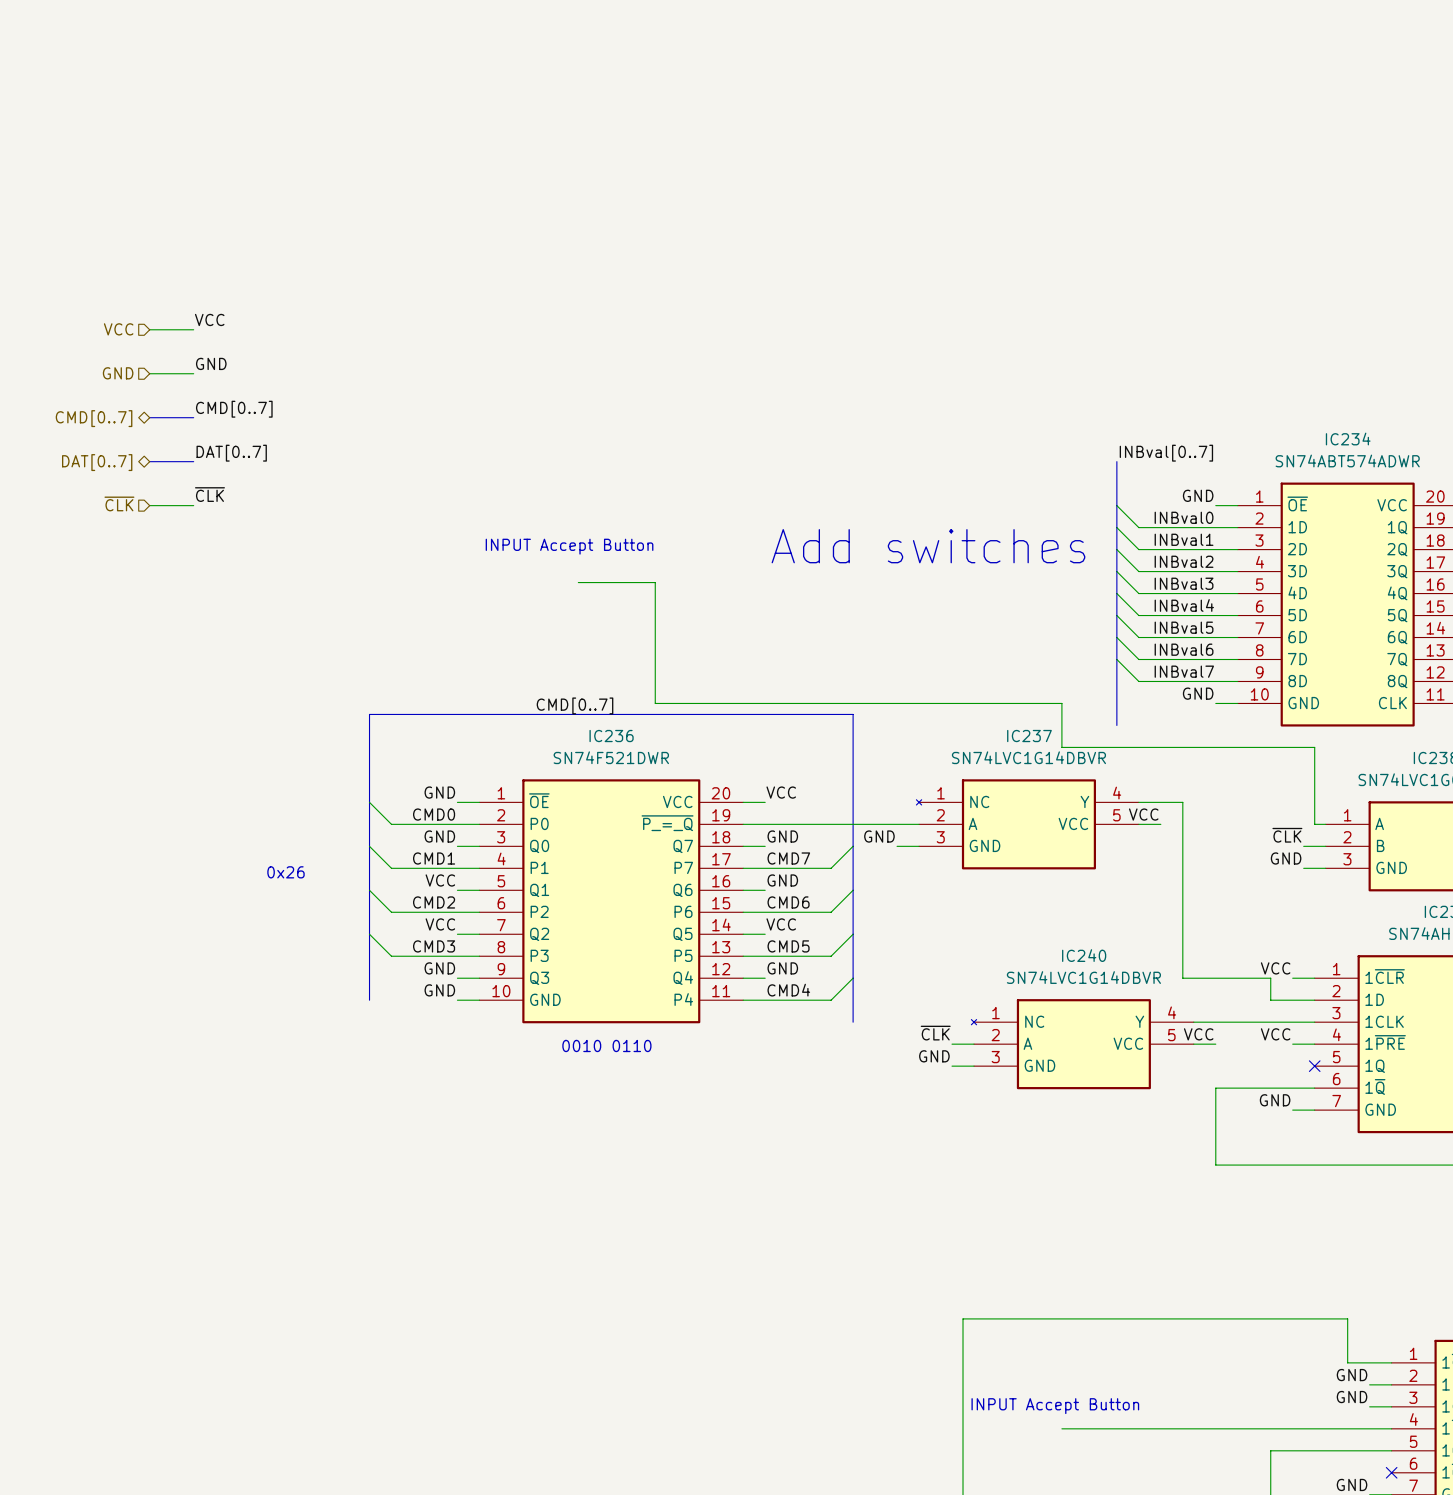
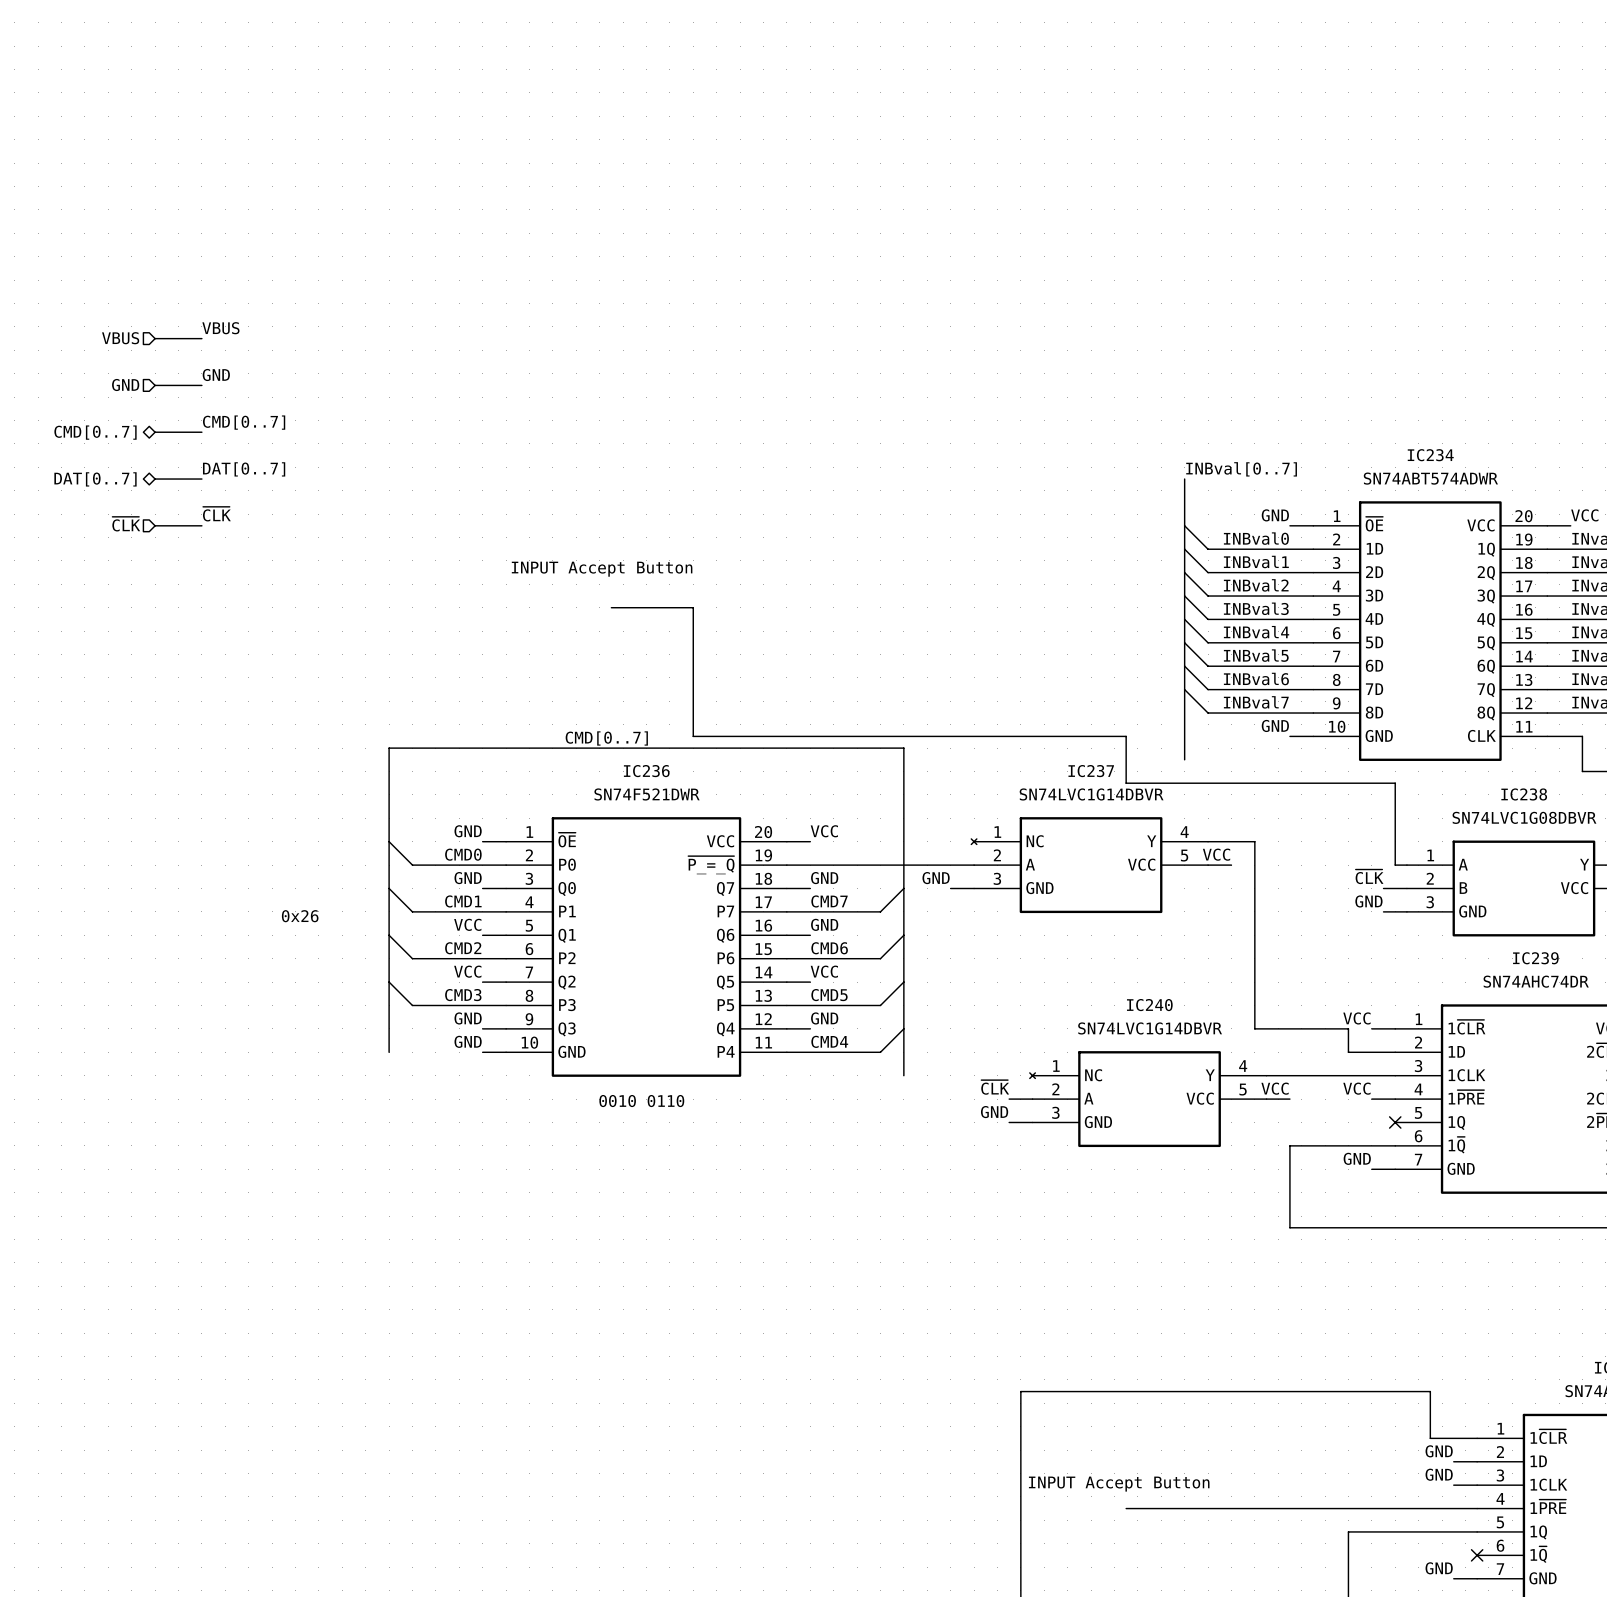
label: VCC (209, 319) -> VBUS (220, 328)
hierarchical label: VCC (118, 329) -> VBUS (120, 338)
text: Add switches (928, 546) -> none

